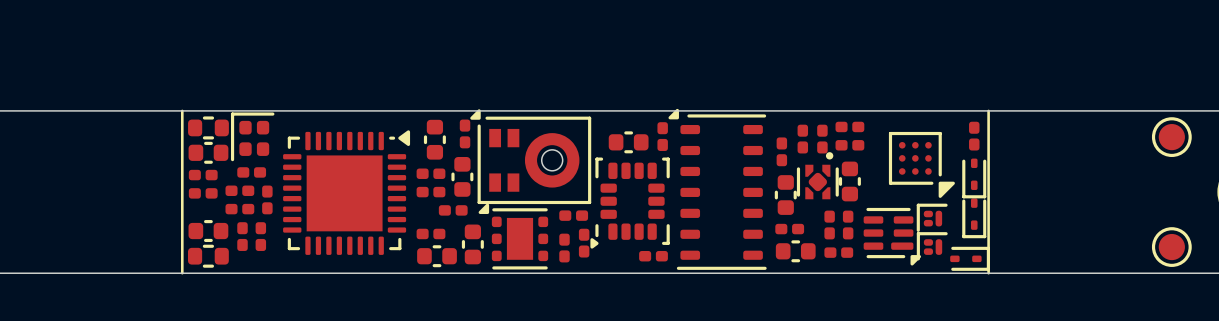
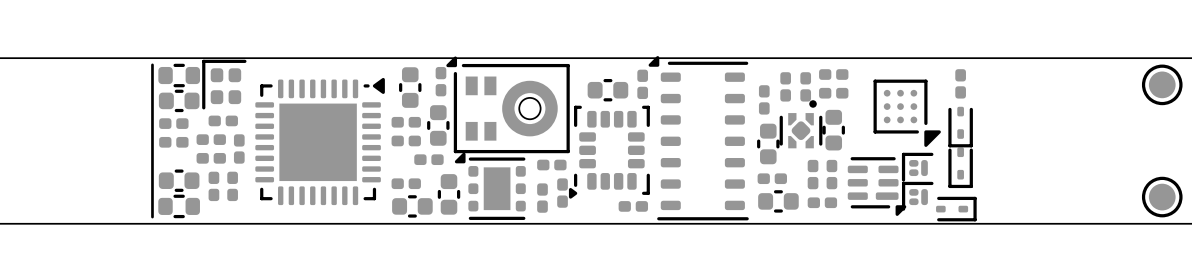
line: (182, 110) (182, 117) -> none
line: (988, 110) (988, 273) -> none
line: (182, 266) (182, 273) -> none

